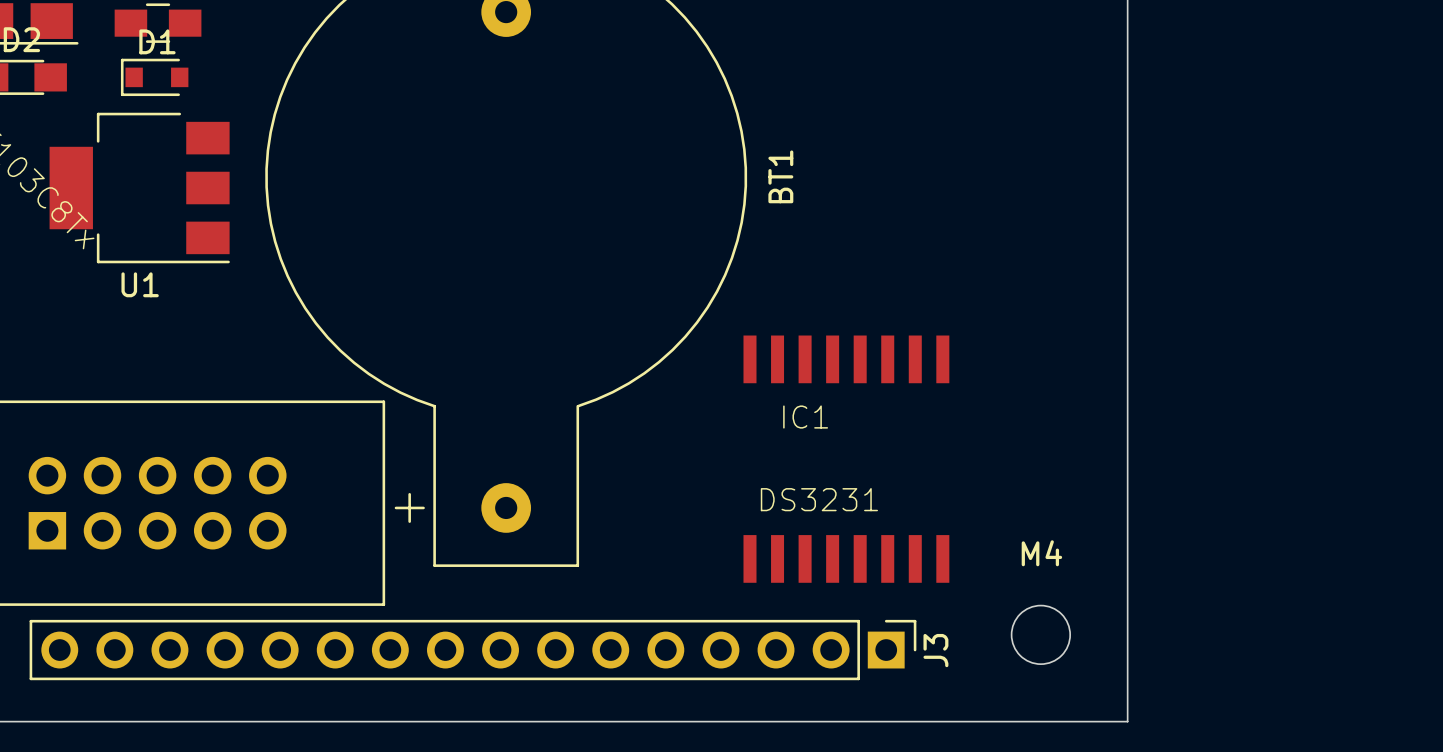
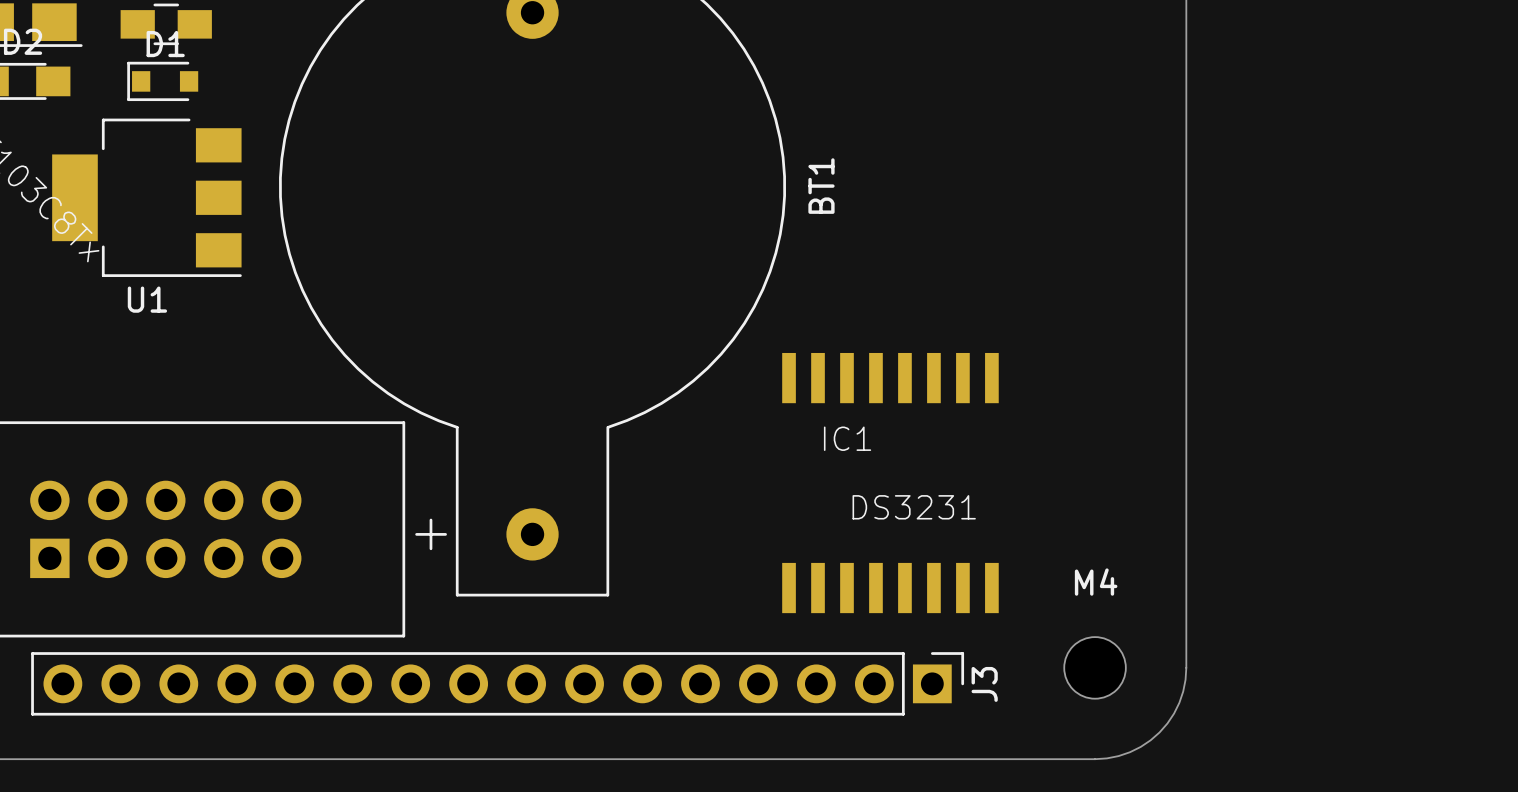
IC1 value position: DS3231 (819, 499) -> DS3231 (914, 507)
board edge: (1127, 634) (1127, 721) (1040, 721) -> (1186, 667) (1183, 691) (1179, 702) (1174, 713) (1159, 732) (1140, 746) (1129, 752) (1118, 756) (1095, 759)

